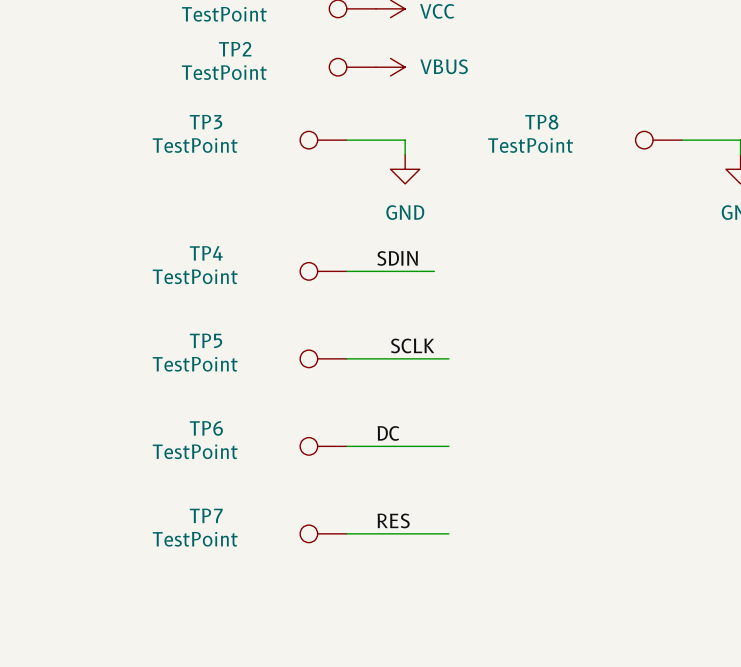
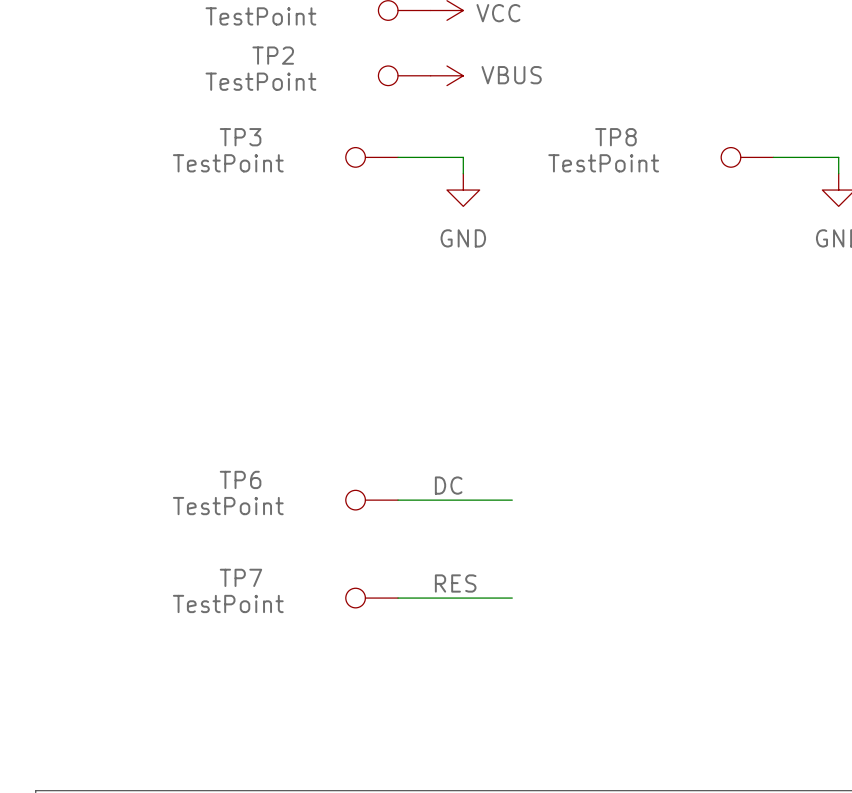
label: SDIN (397, 258) -> none
TP4: TestPoint (323, 271) -> none
wire: (346, 271) (434, 271) -> none
label: SCLK (412, 345) -> none
TP5: TestPoint (323, 358) -> none
wire: (346, 358) (448, 358) -> none

